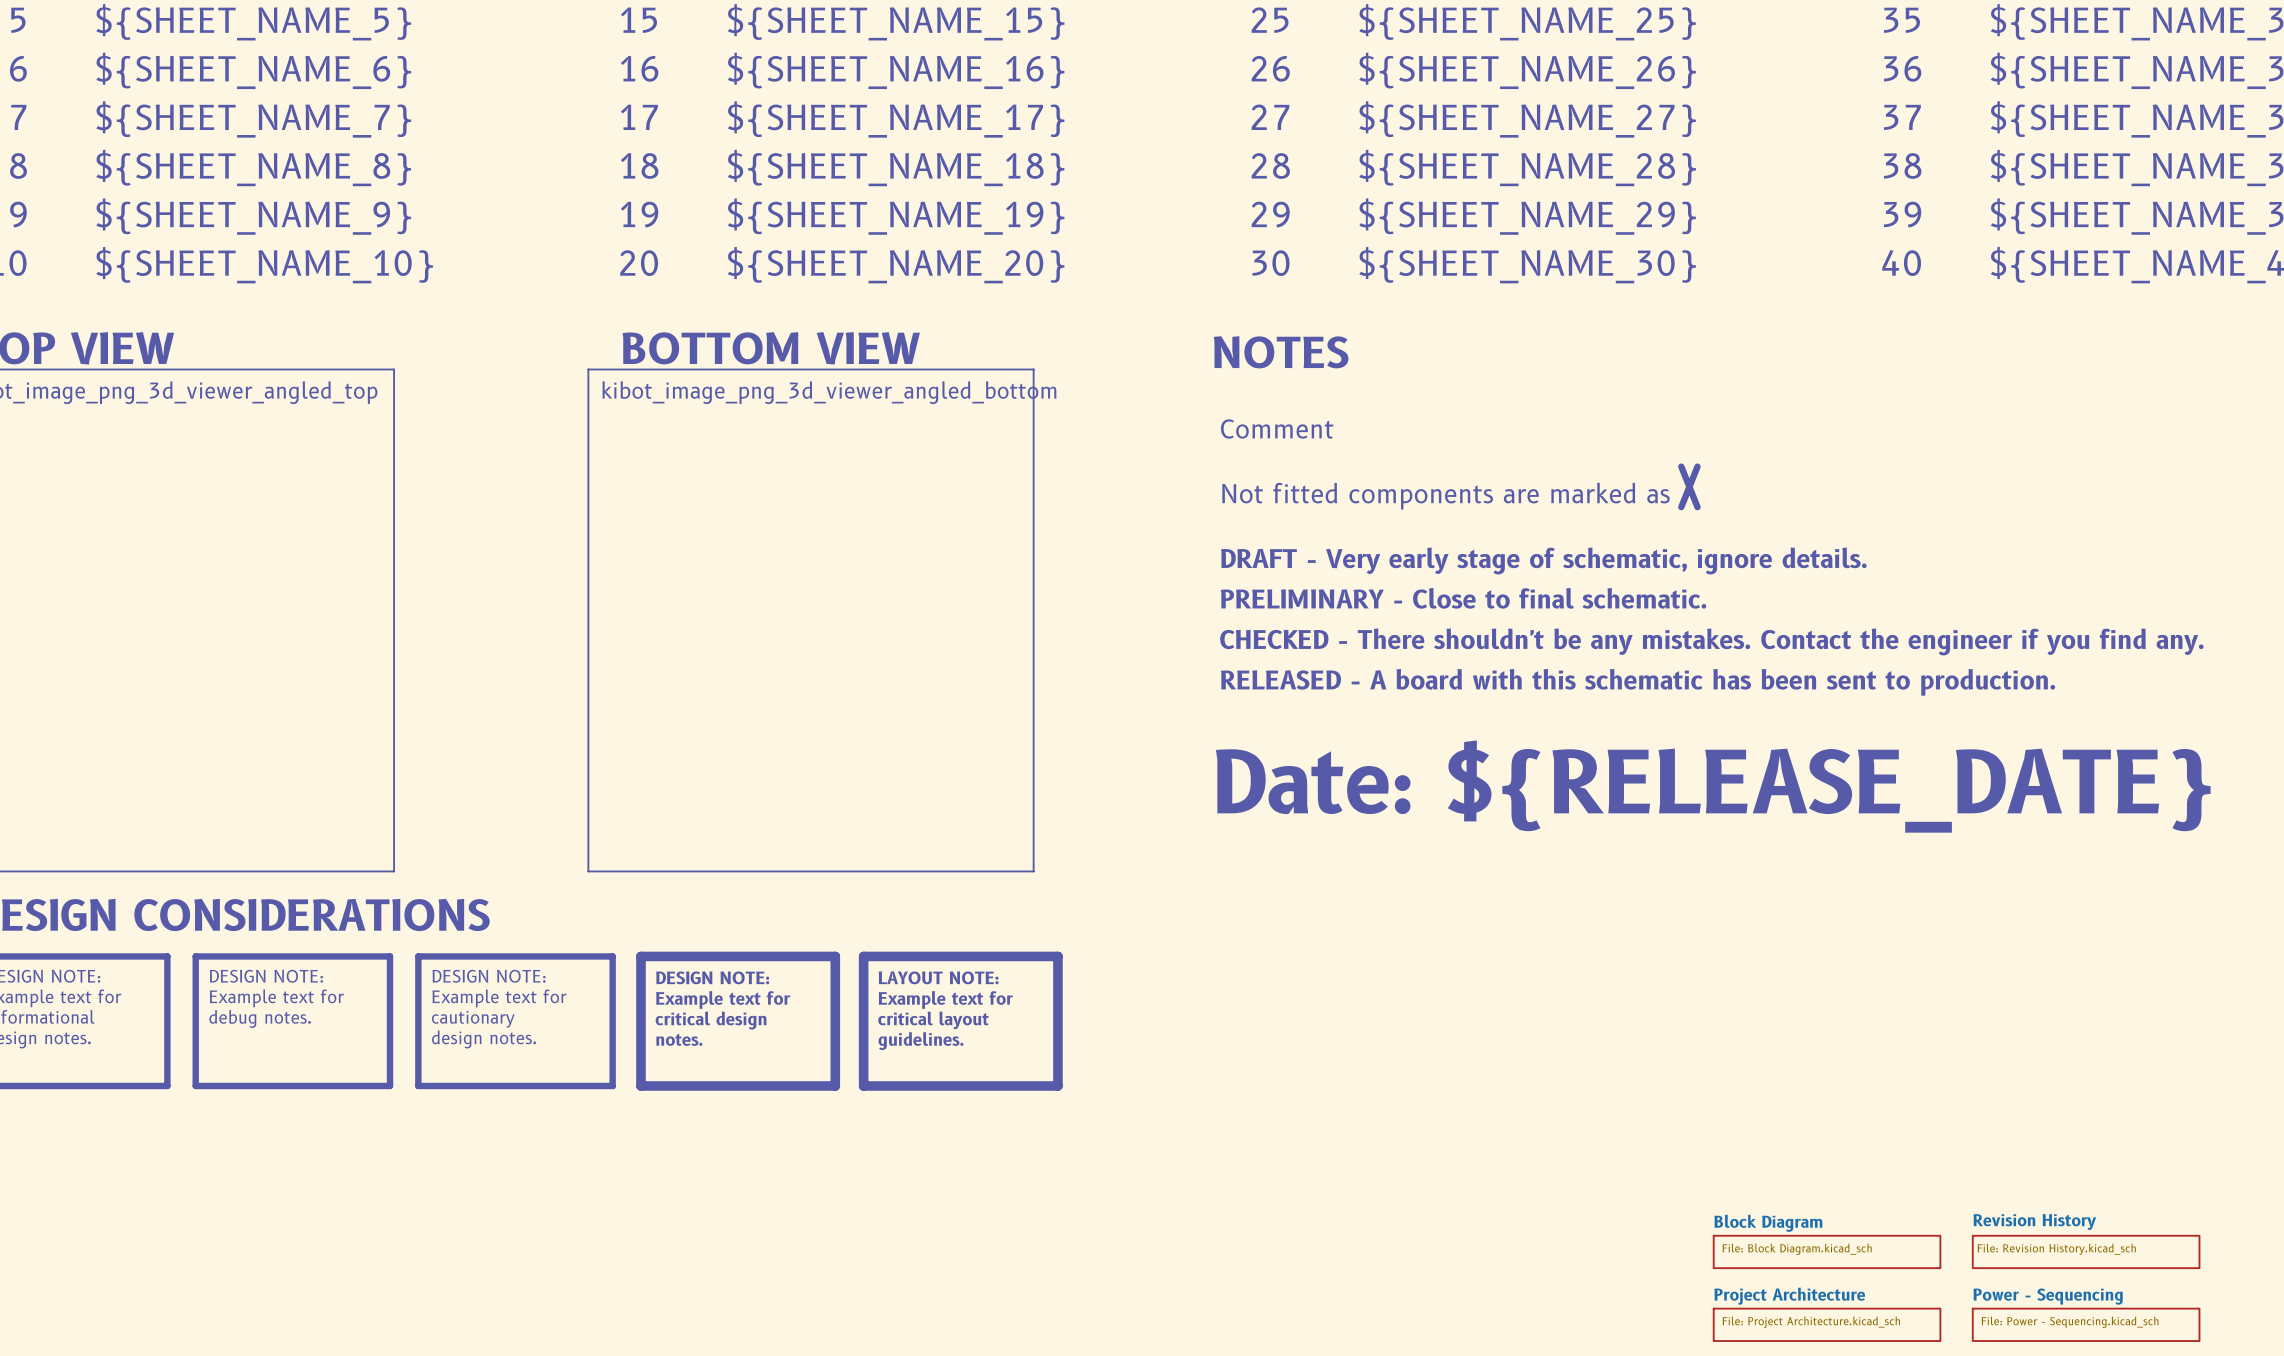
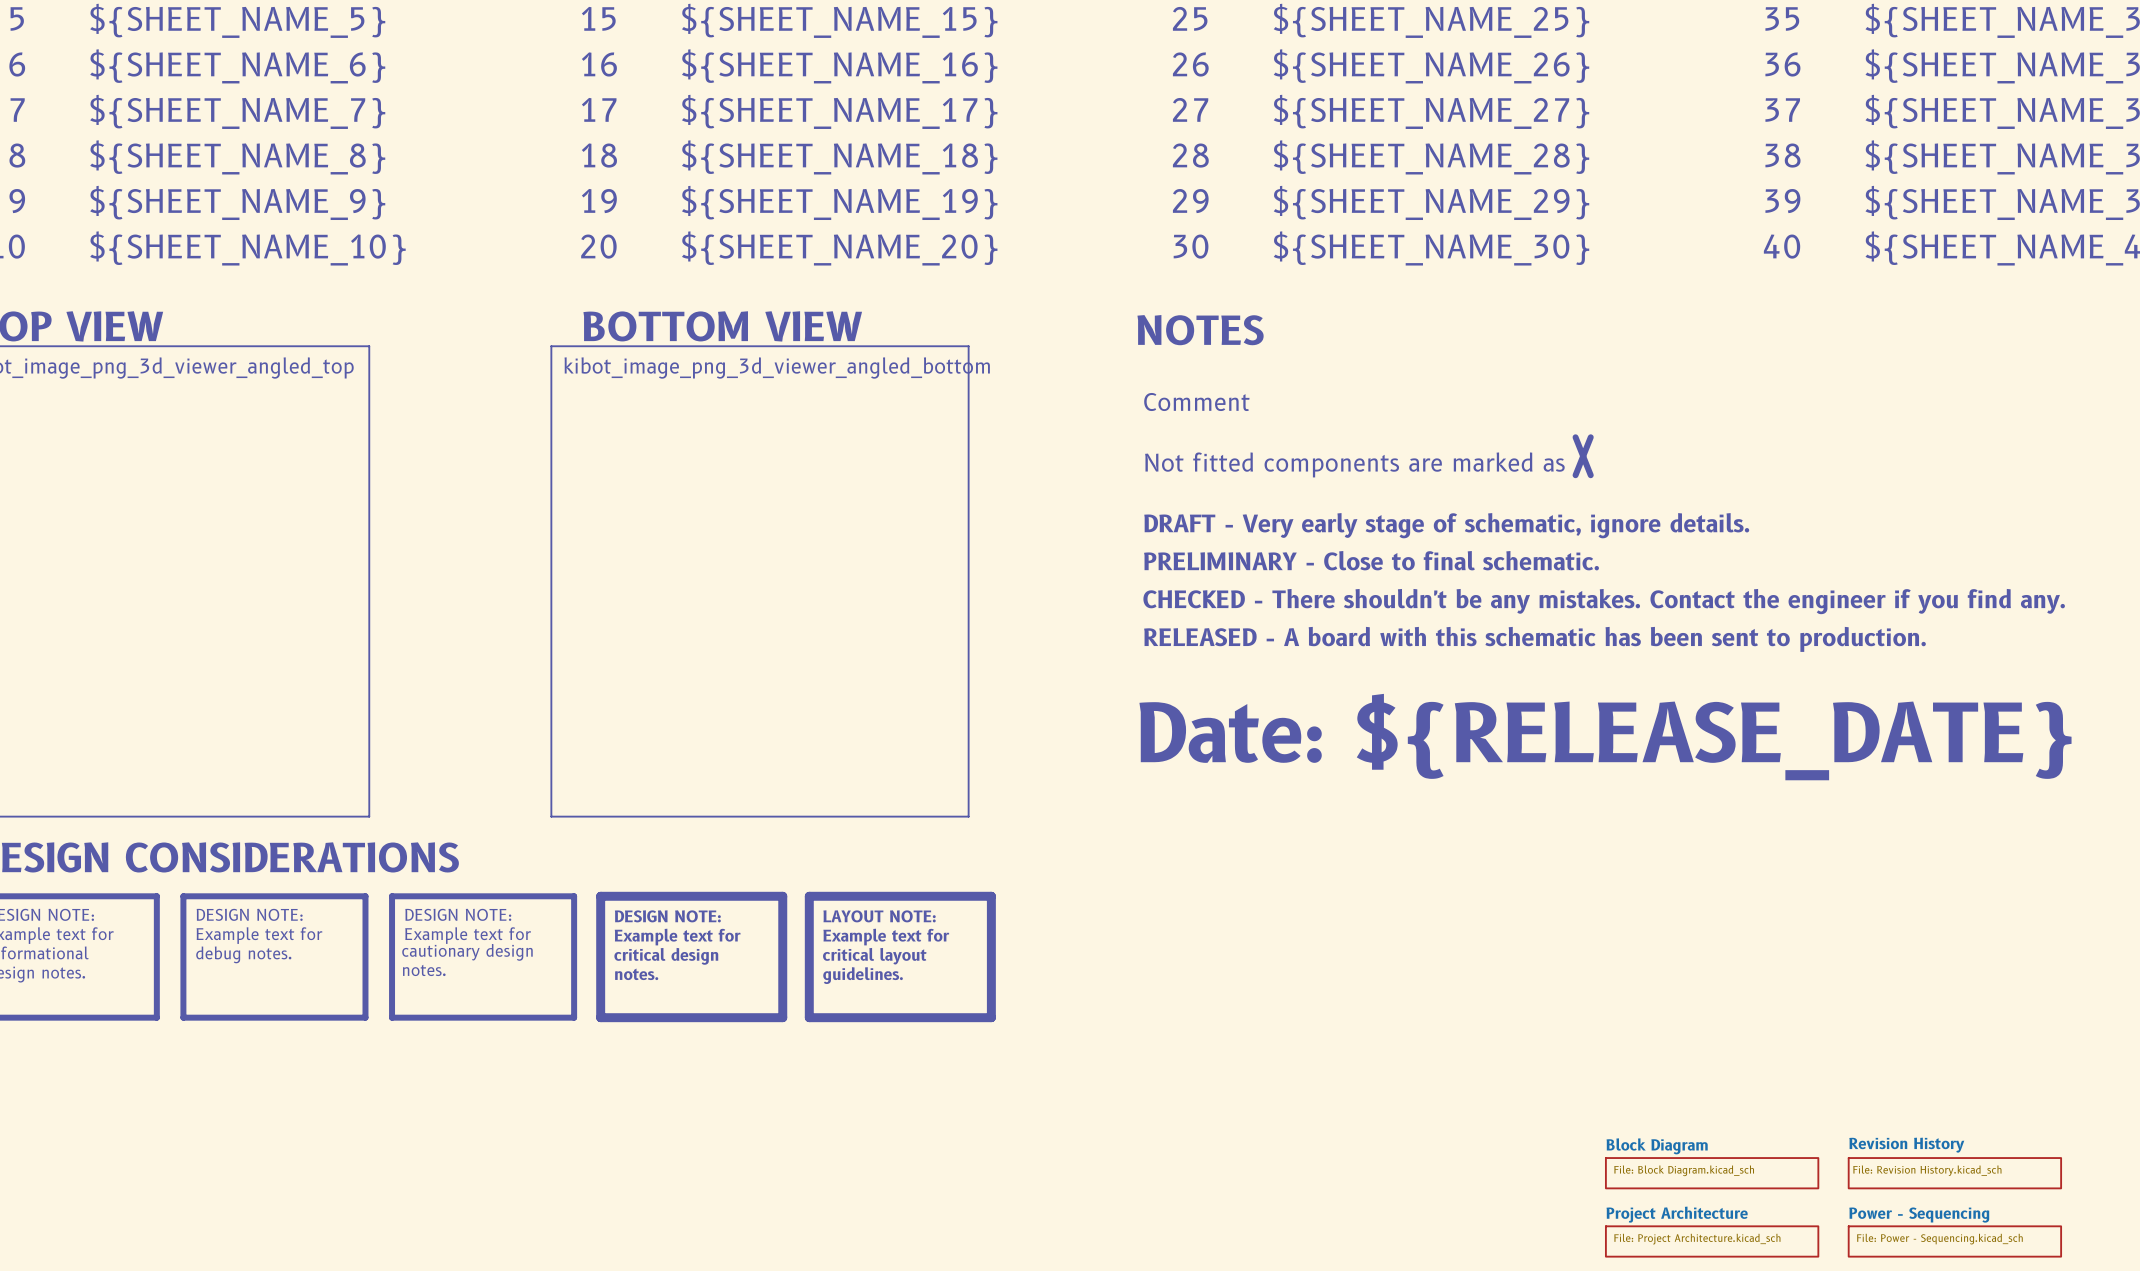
text: cautionary (473, 1019) -> cautionary design (467, 952)
text: design notes. (484, 1039) -> notes. (424, 970)

